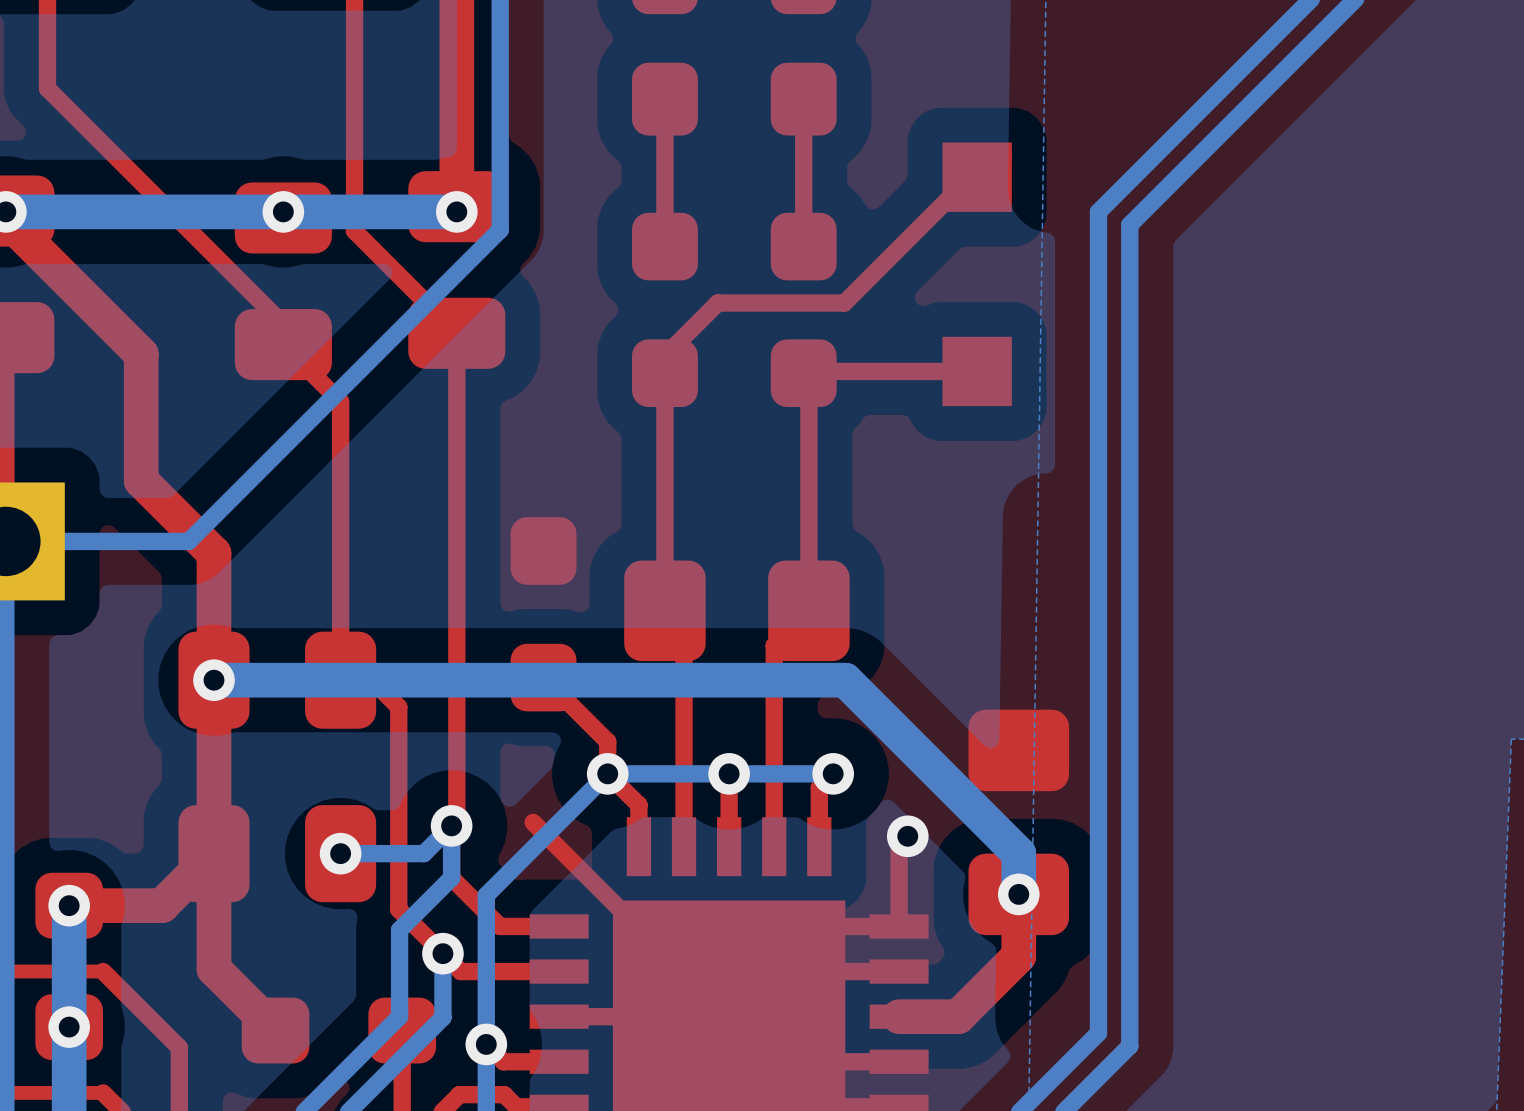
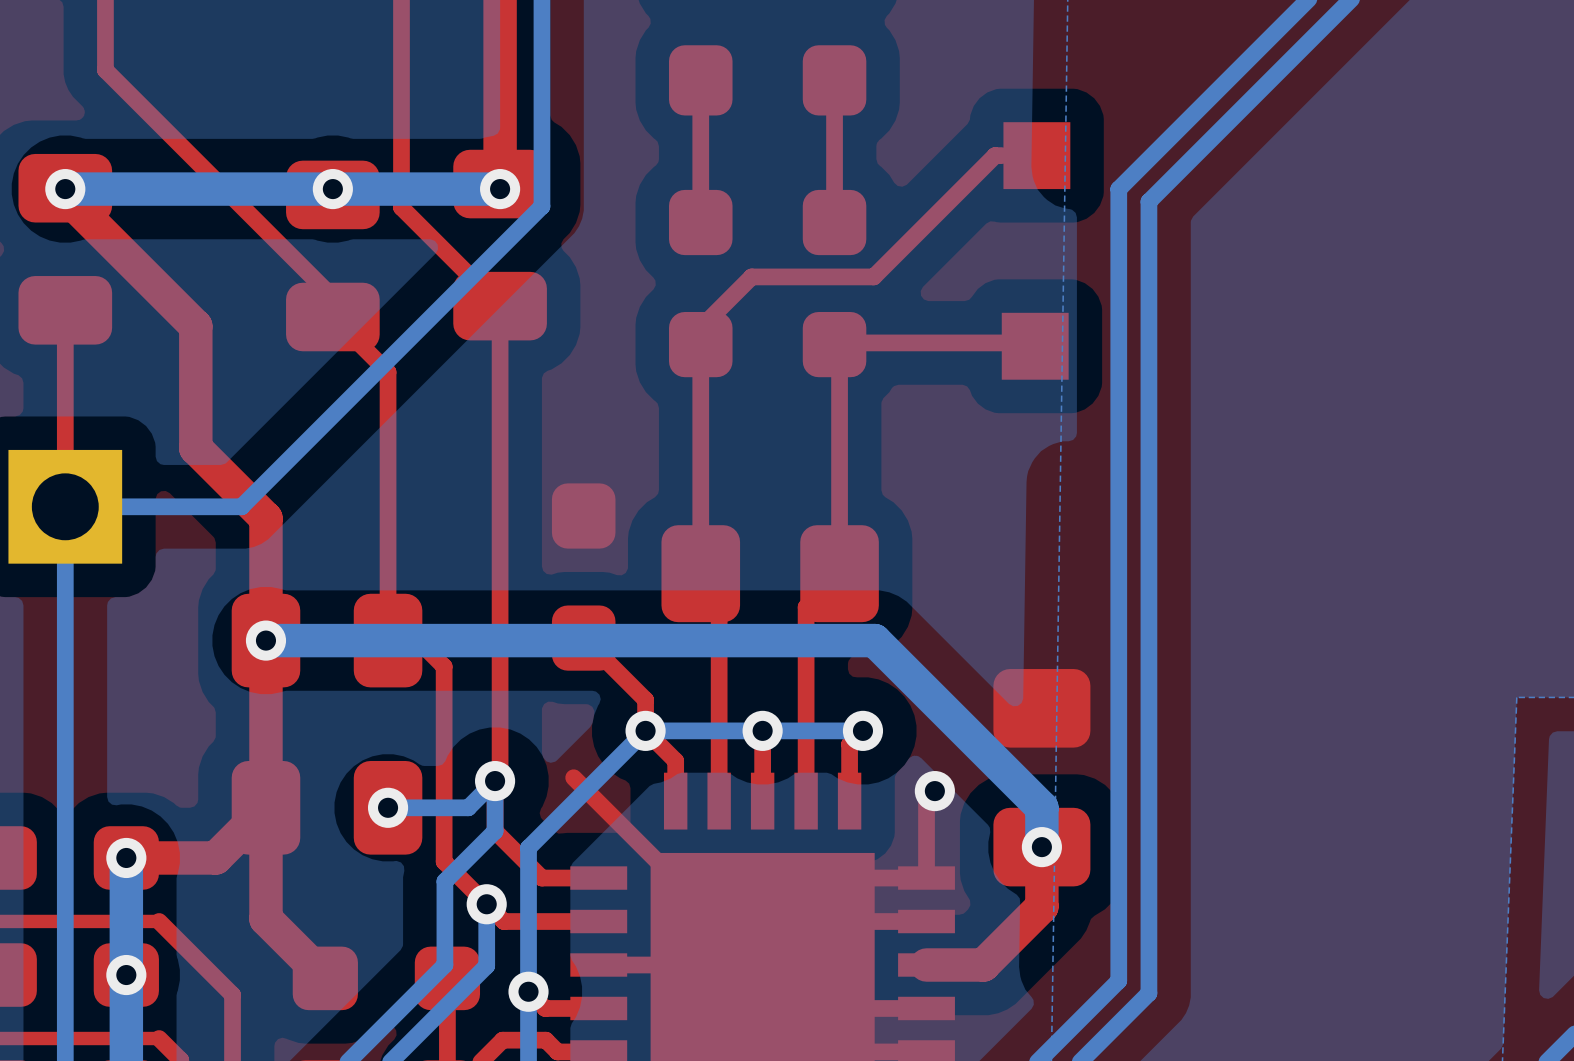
part position: (977, 177) -> (1036, 155)
part position: (977, 371) -> (1035, 346)

